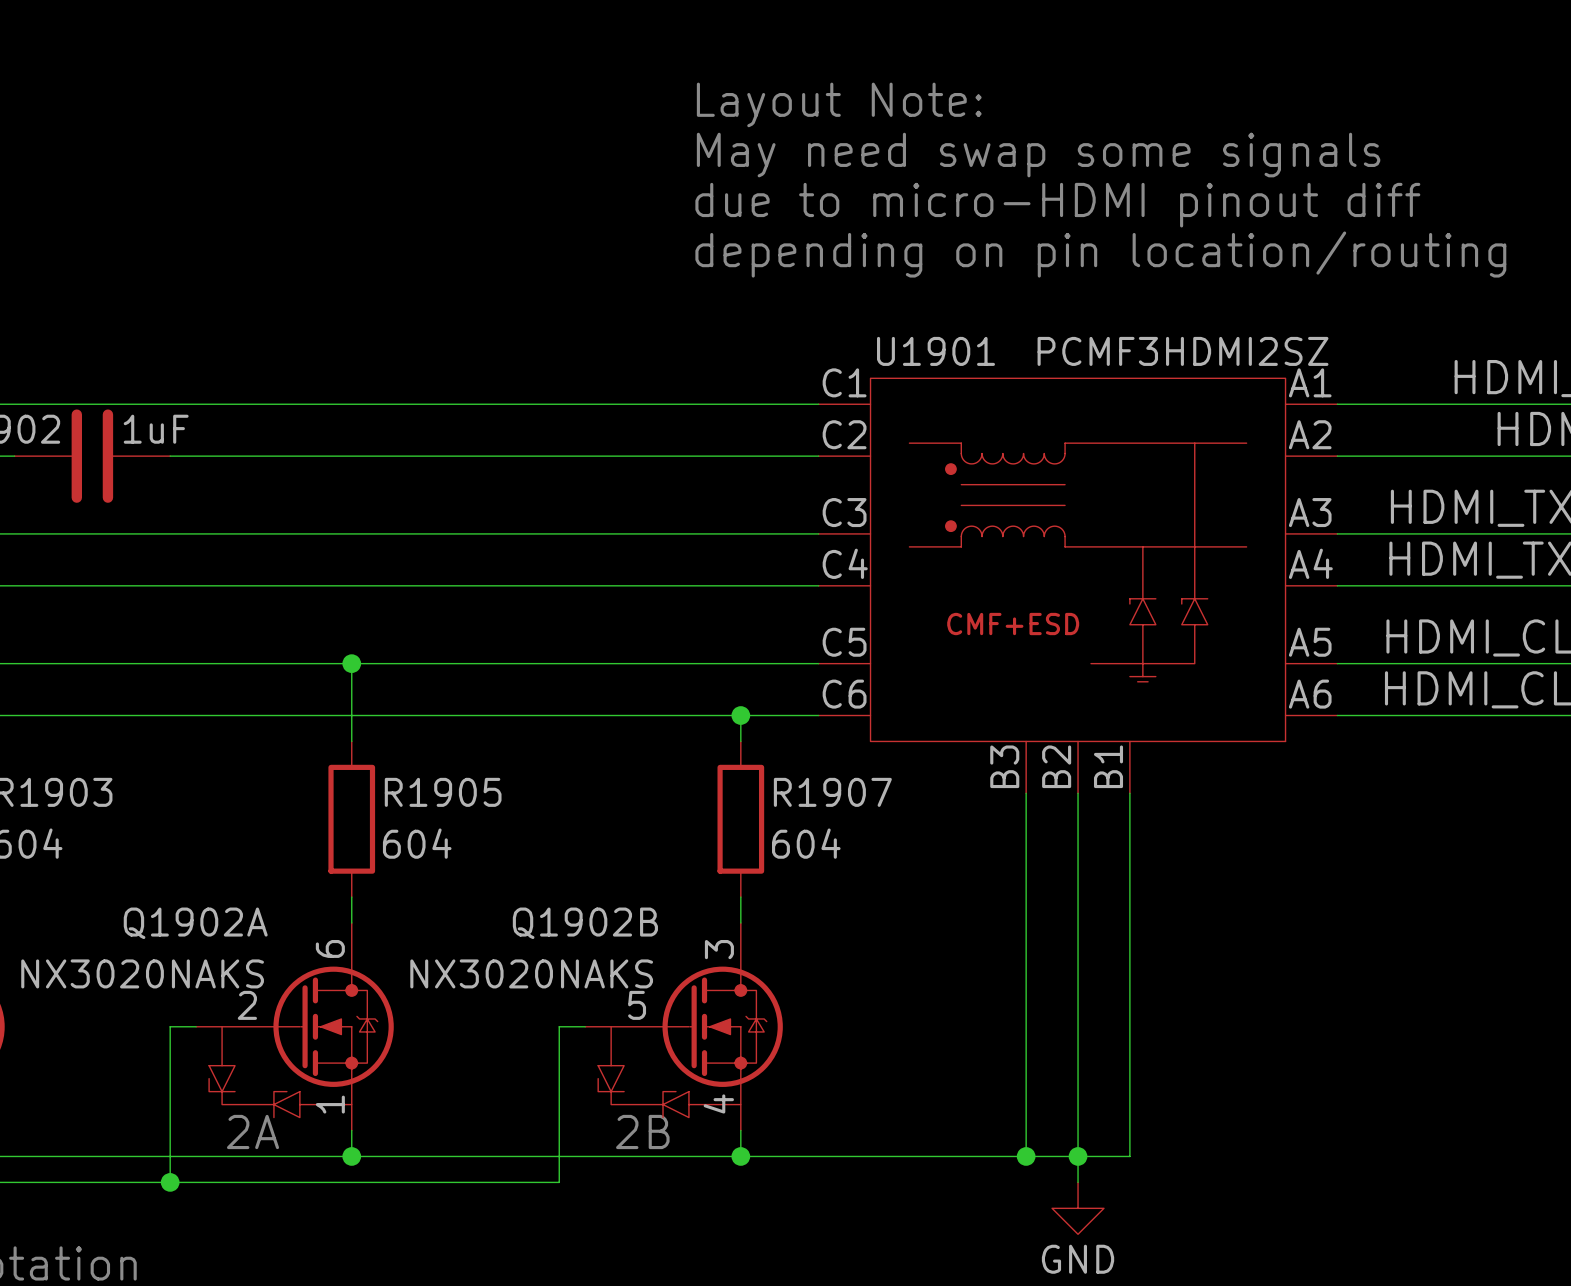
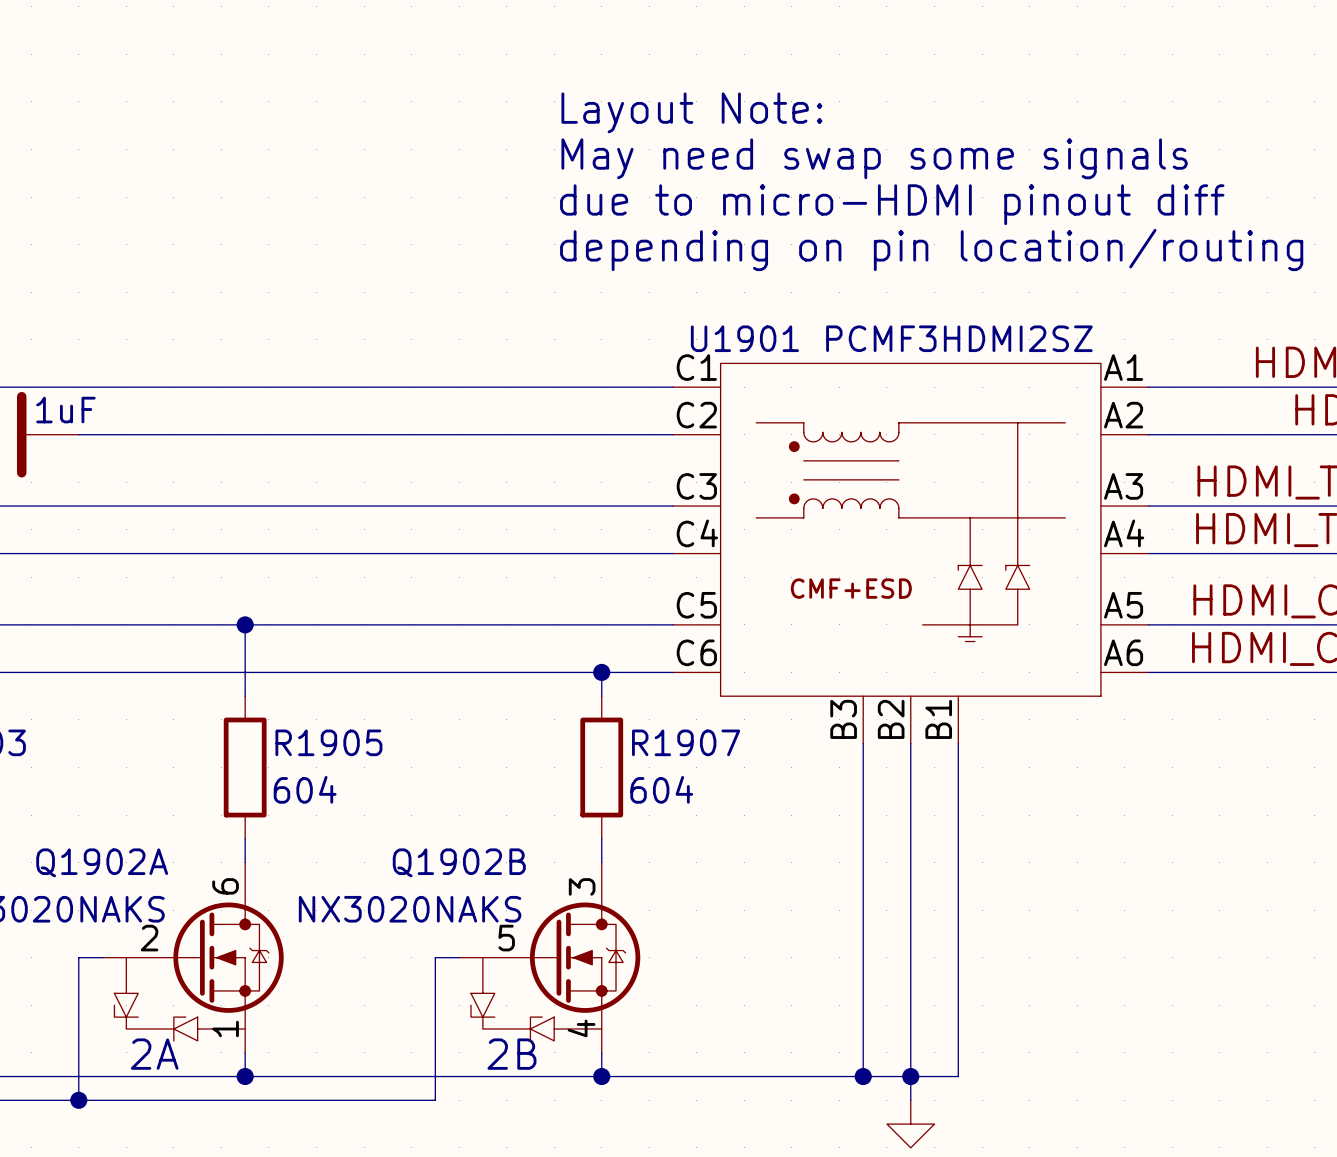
U1901 name position: U1901 (935, 351) -> U1901 (744, 338)
U1901 value position: PCMF3HDMI2SZ (1183, 351) -> PCMF3HDMI2SZ (959, 338)

